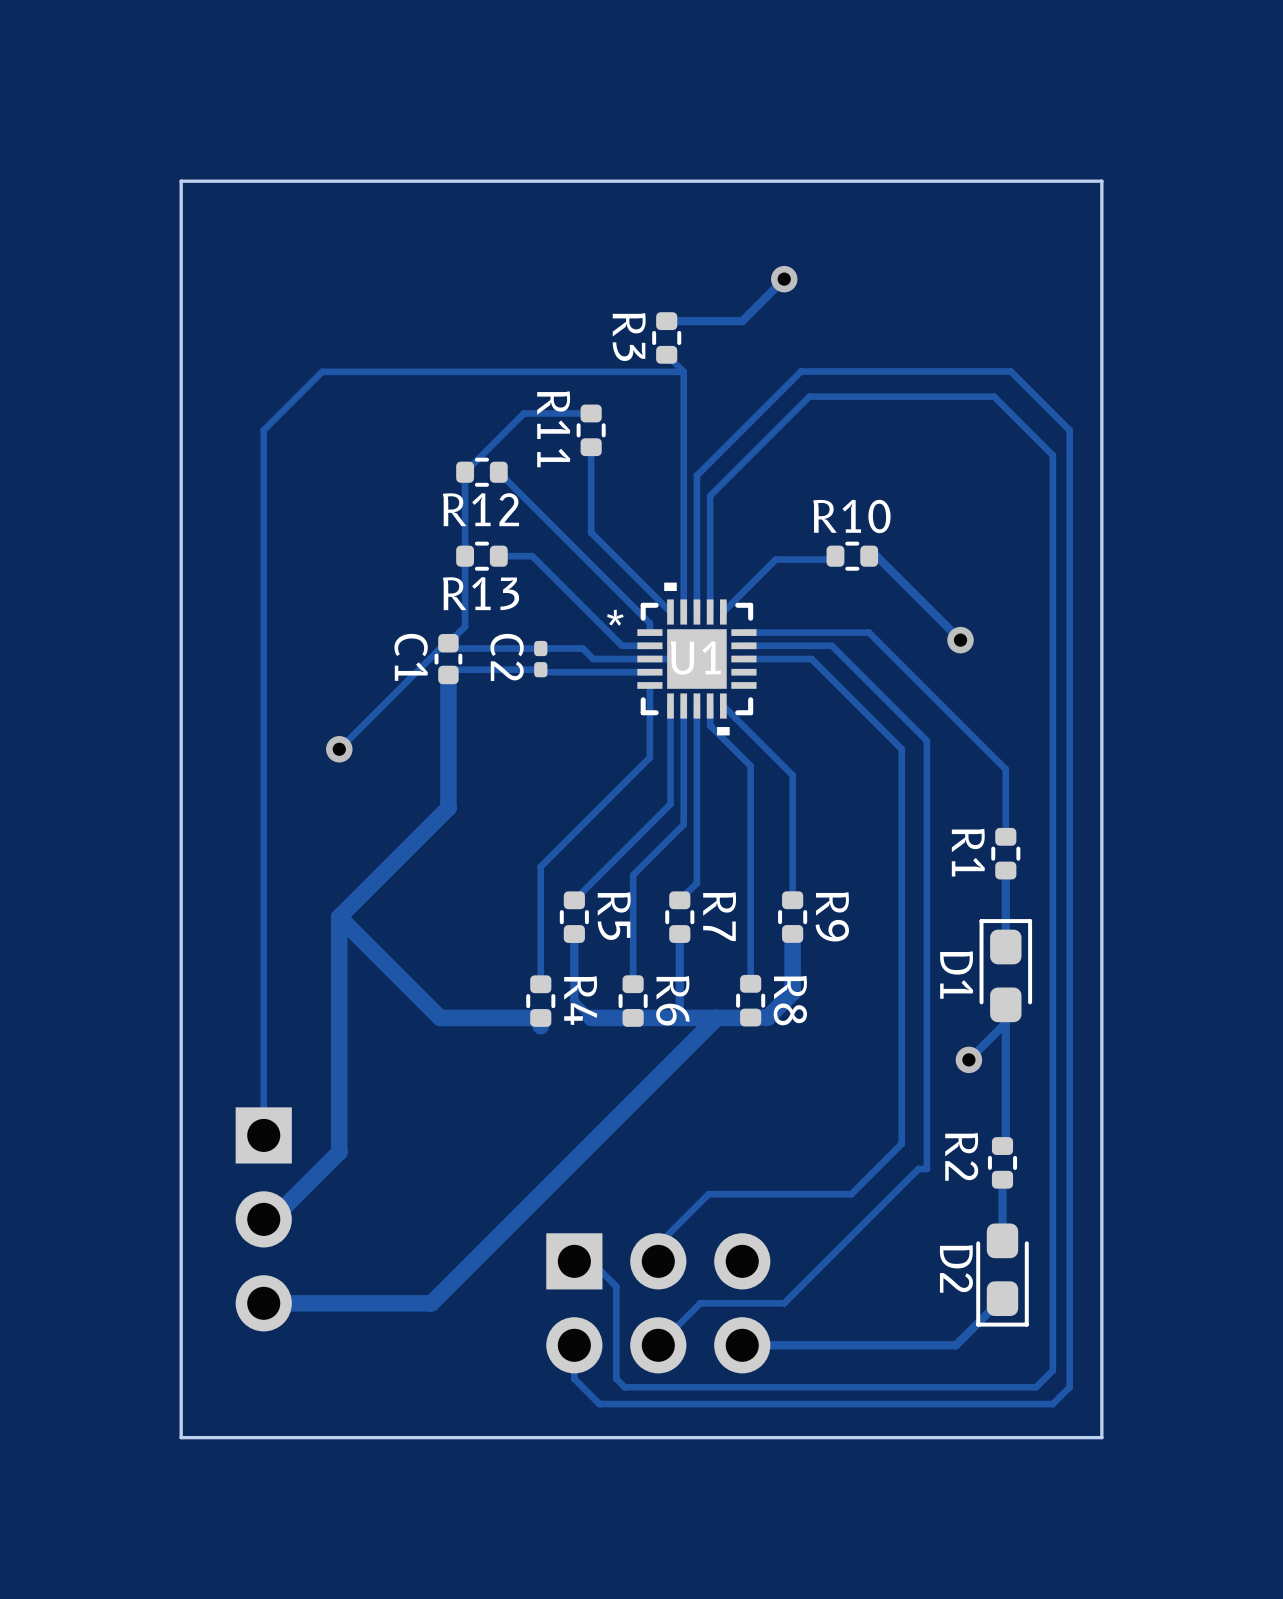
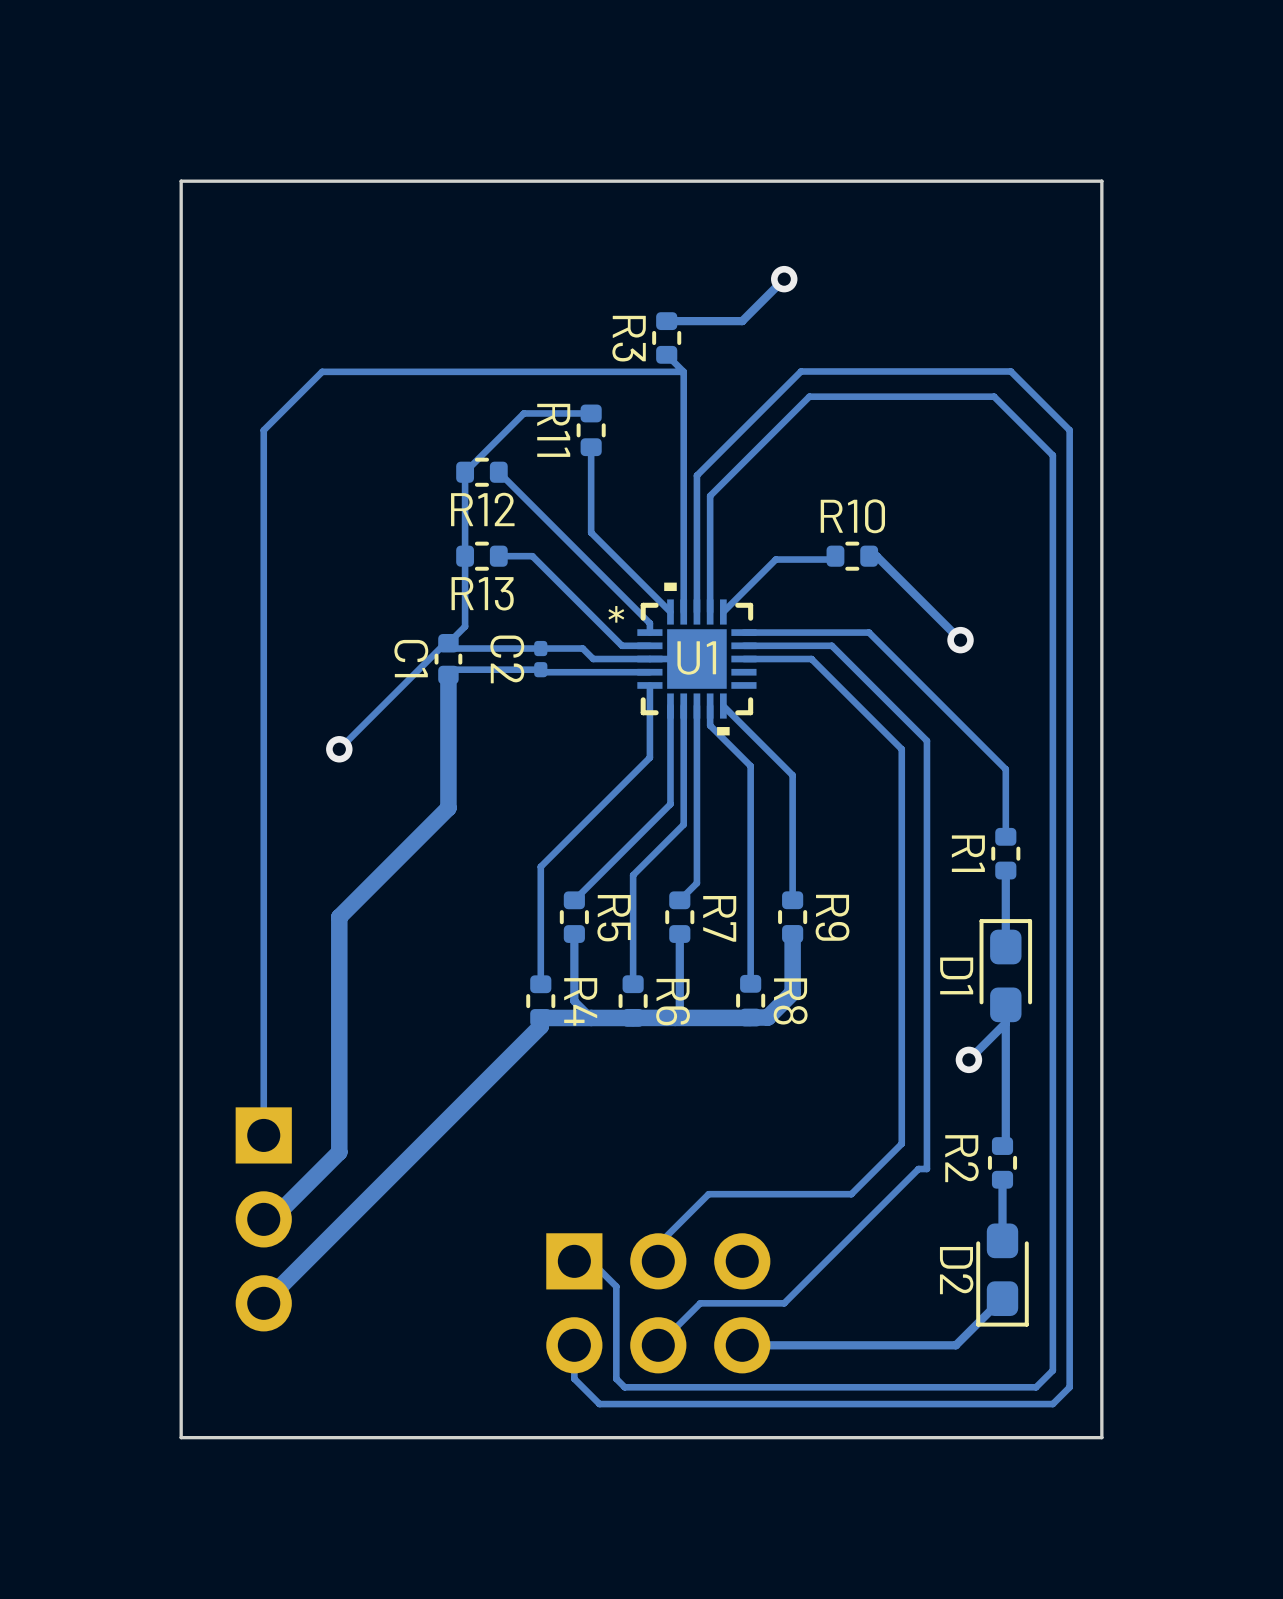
track: (339, 917) (440, 1017) (540, 1017) -> (591, 1017) (540, 1017)
track: (716, 1017) (431, 1303) (263, 1303) -> (540, 1026) (263, 1303)

